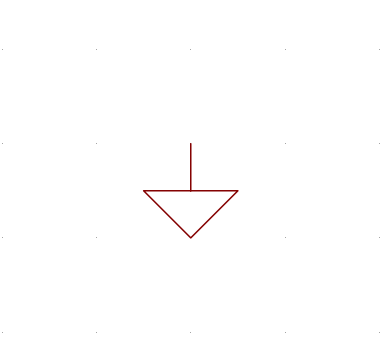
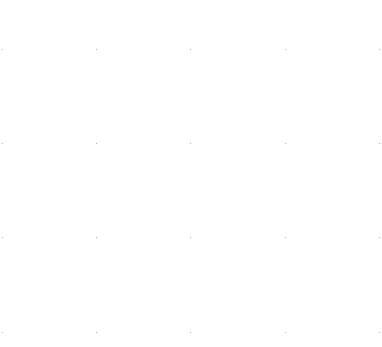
power symbol: (190, 190) -> none

